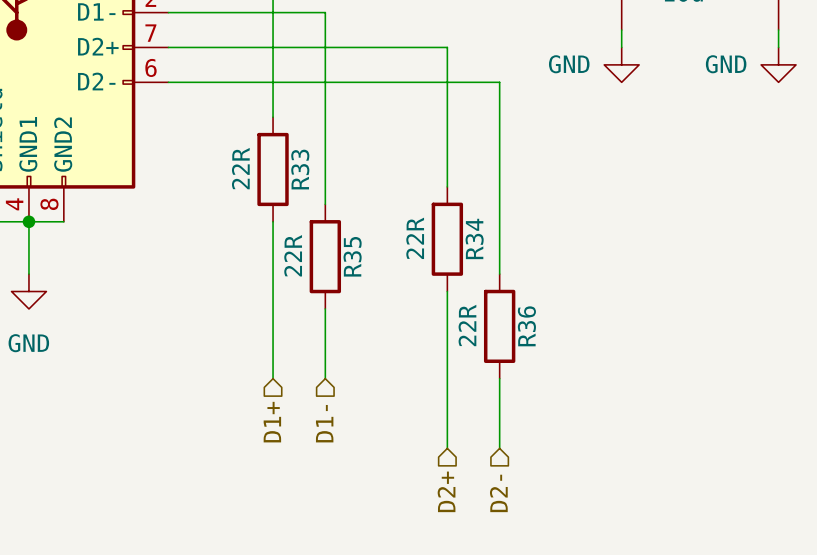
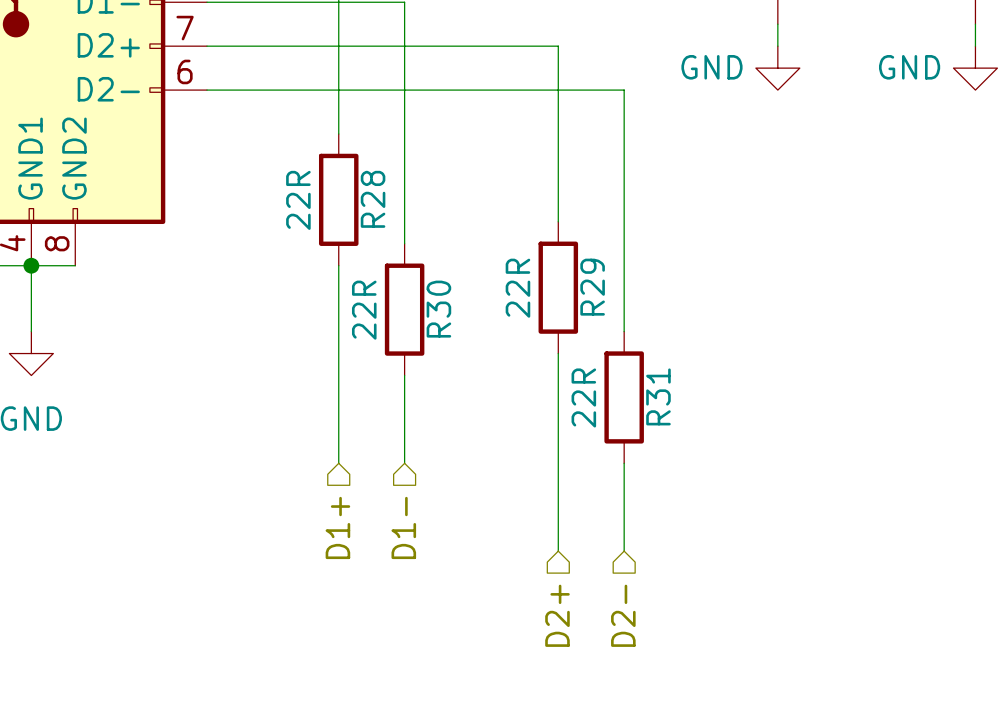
R33 name: R33 (300, 169) -> R28 (373, 199)
R34 name: R34 (474, 238) -> R29 (592, 287)
R35 name: R35 (352, 256) -> R30 (438, 309)
R36 name: R36 (526, 326) -> R31 (658, 396)

